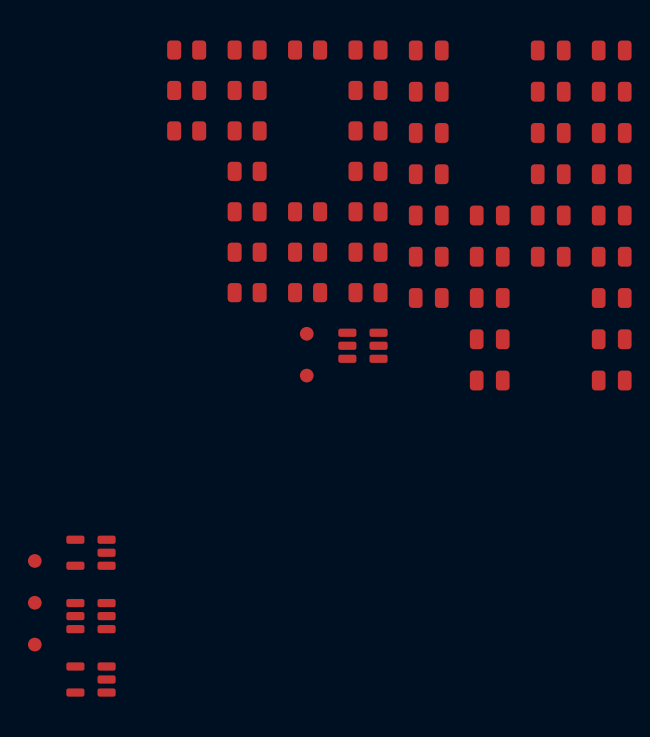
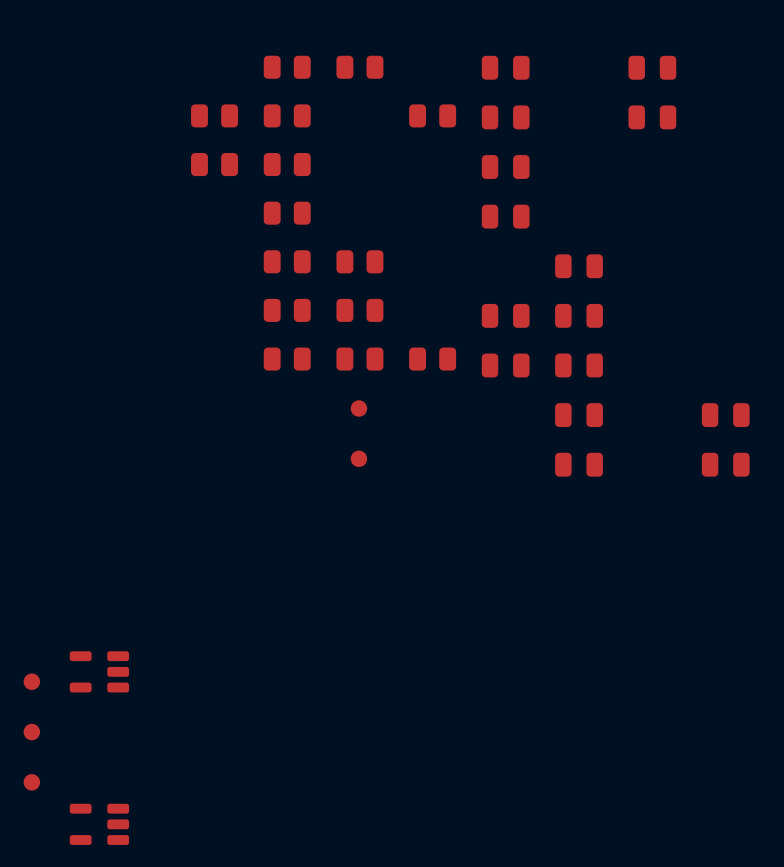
part: (186, 50) -> none
part: (368, 50) -> none
part: (611, 50) -> none
part: (611, 91) -> none
part: (368, 130) -> none
part: (550, 132) -> none
part: (611, 132) -> none
part: (368, 171) -> none
part: (550, 174) -> none
part: (611, 174) -> none
part: (368, 211) -> none
part: (428, 215) -> none
part: (550, 215) -> none
part: (611, 215) -> none
part: (368, 252) -> none
part: (550, 256) -> none
part: (611, 256) -> none
part: (611, 297) -> none
part: (362, 345) -> none
part: (90, 616) -> none

